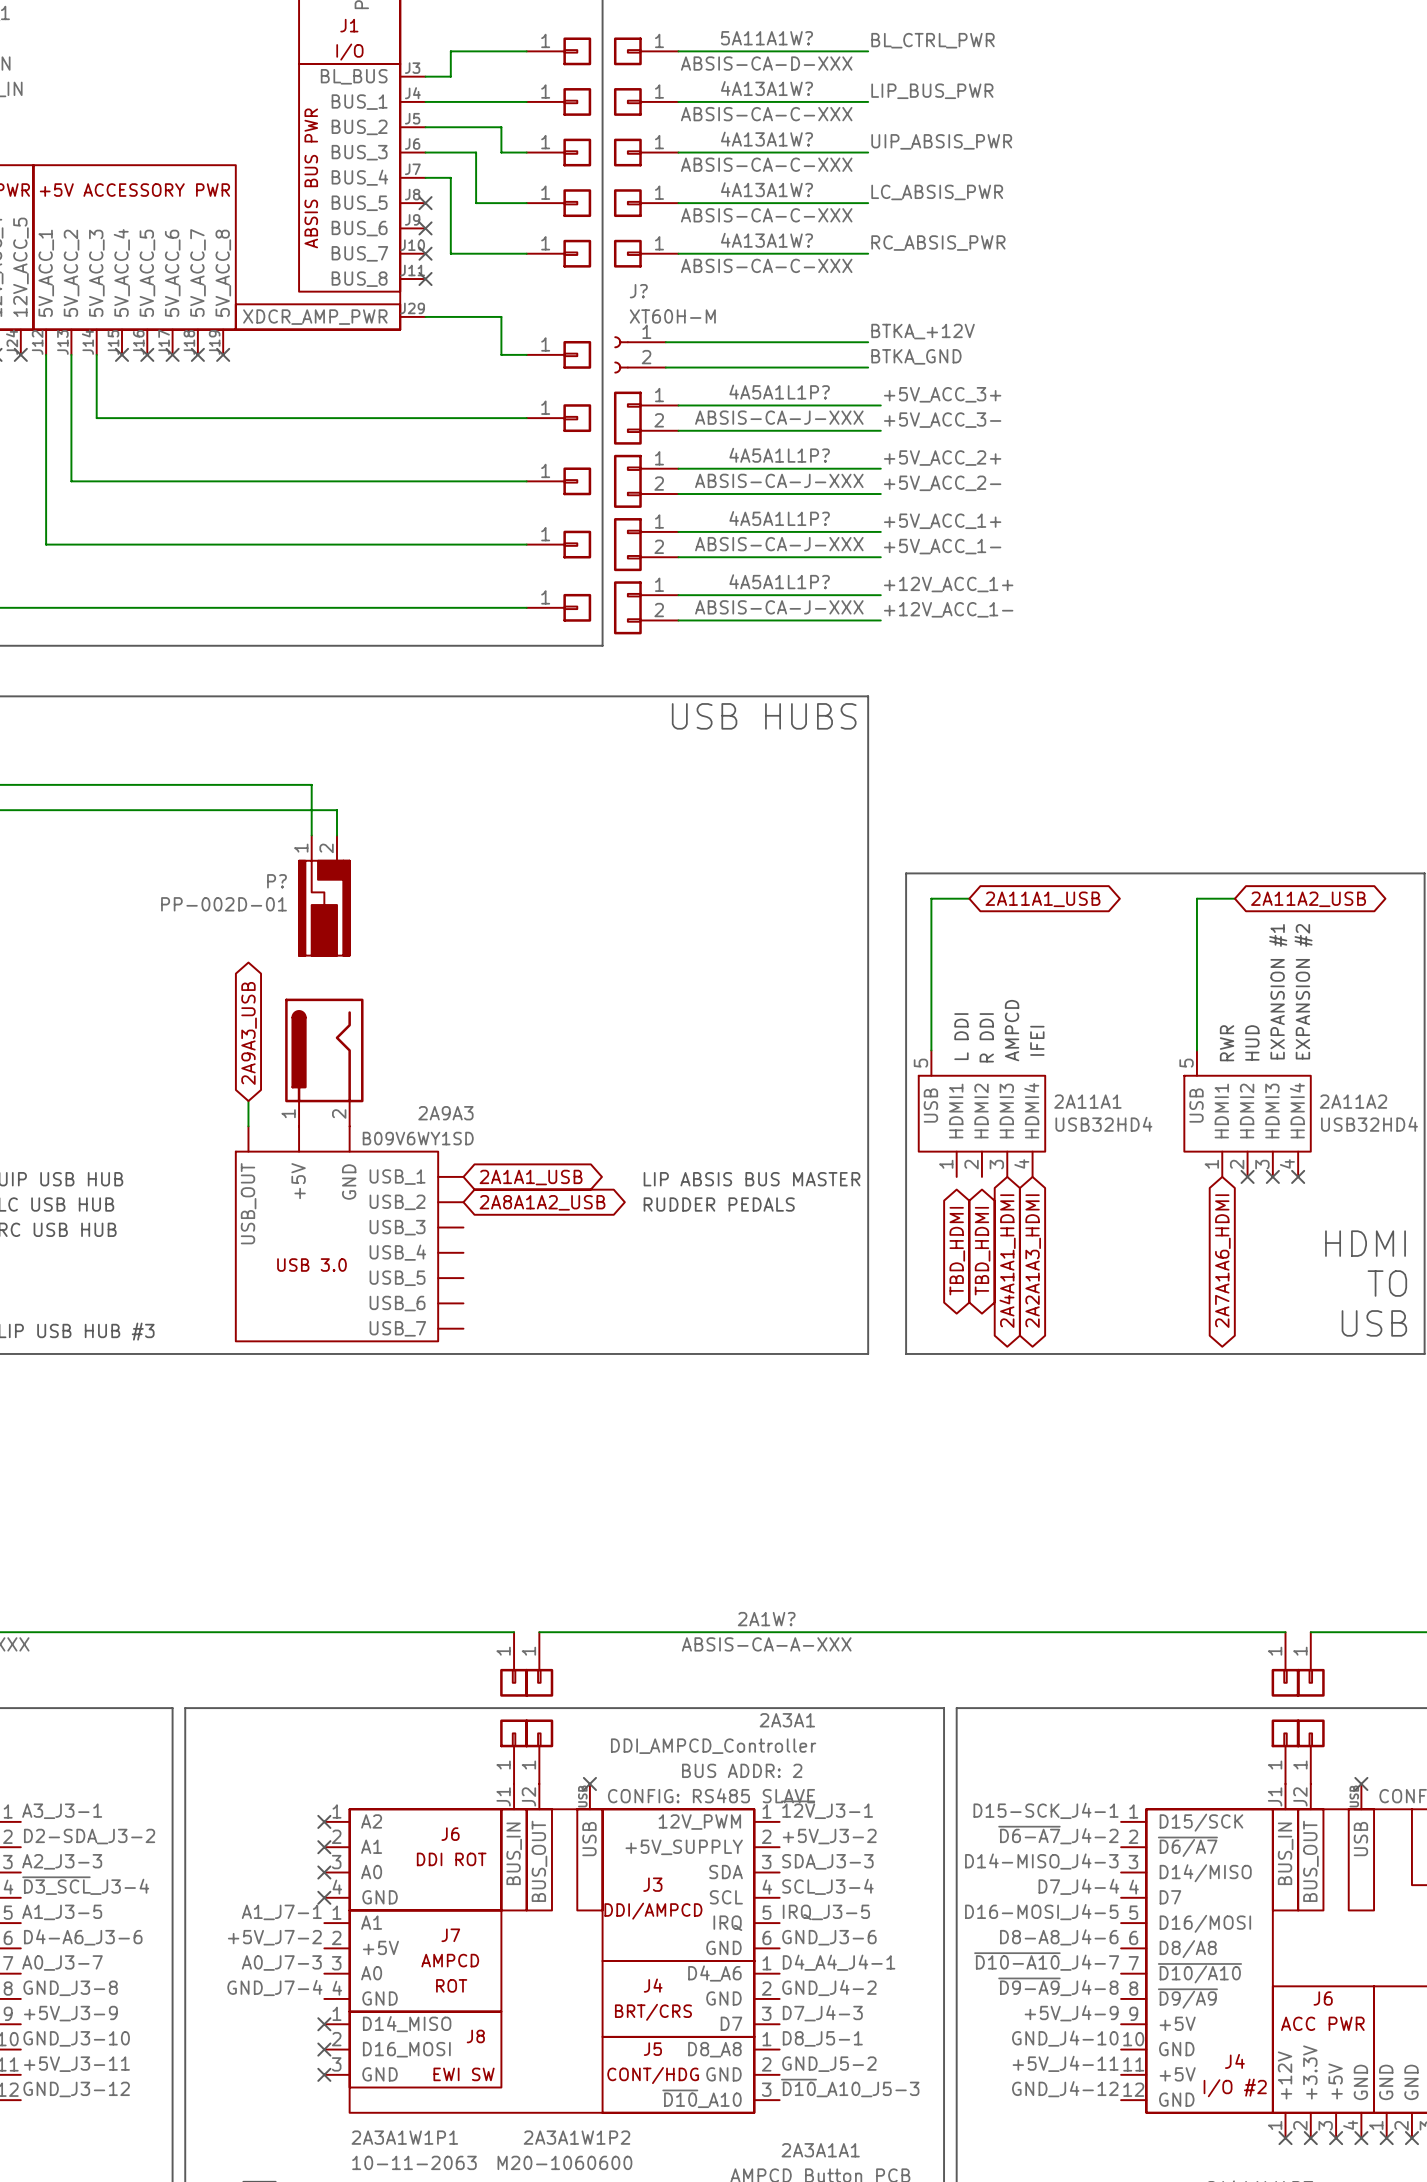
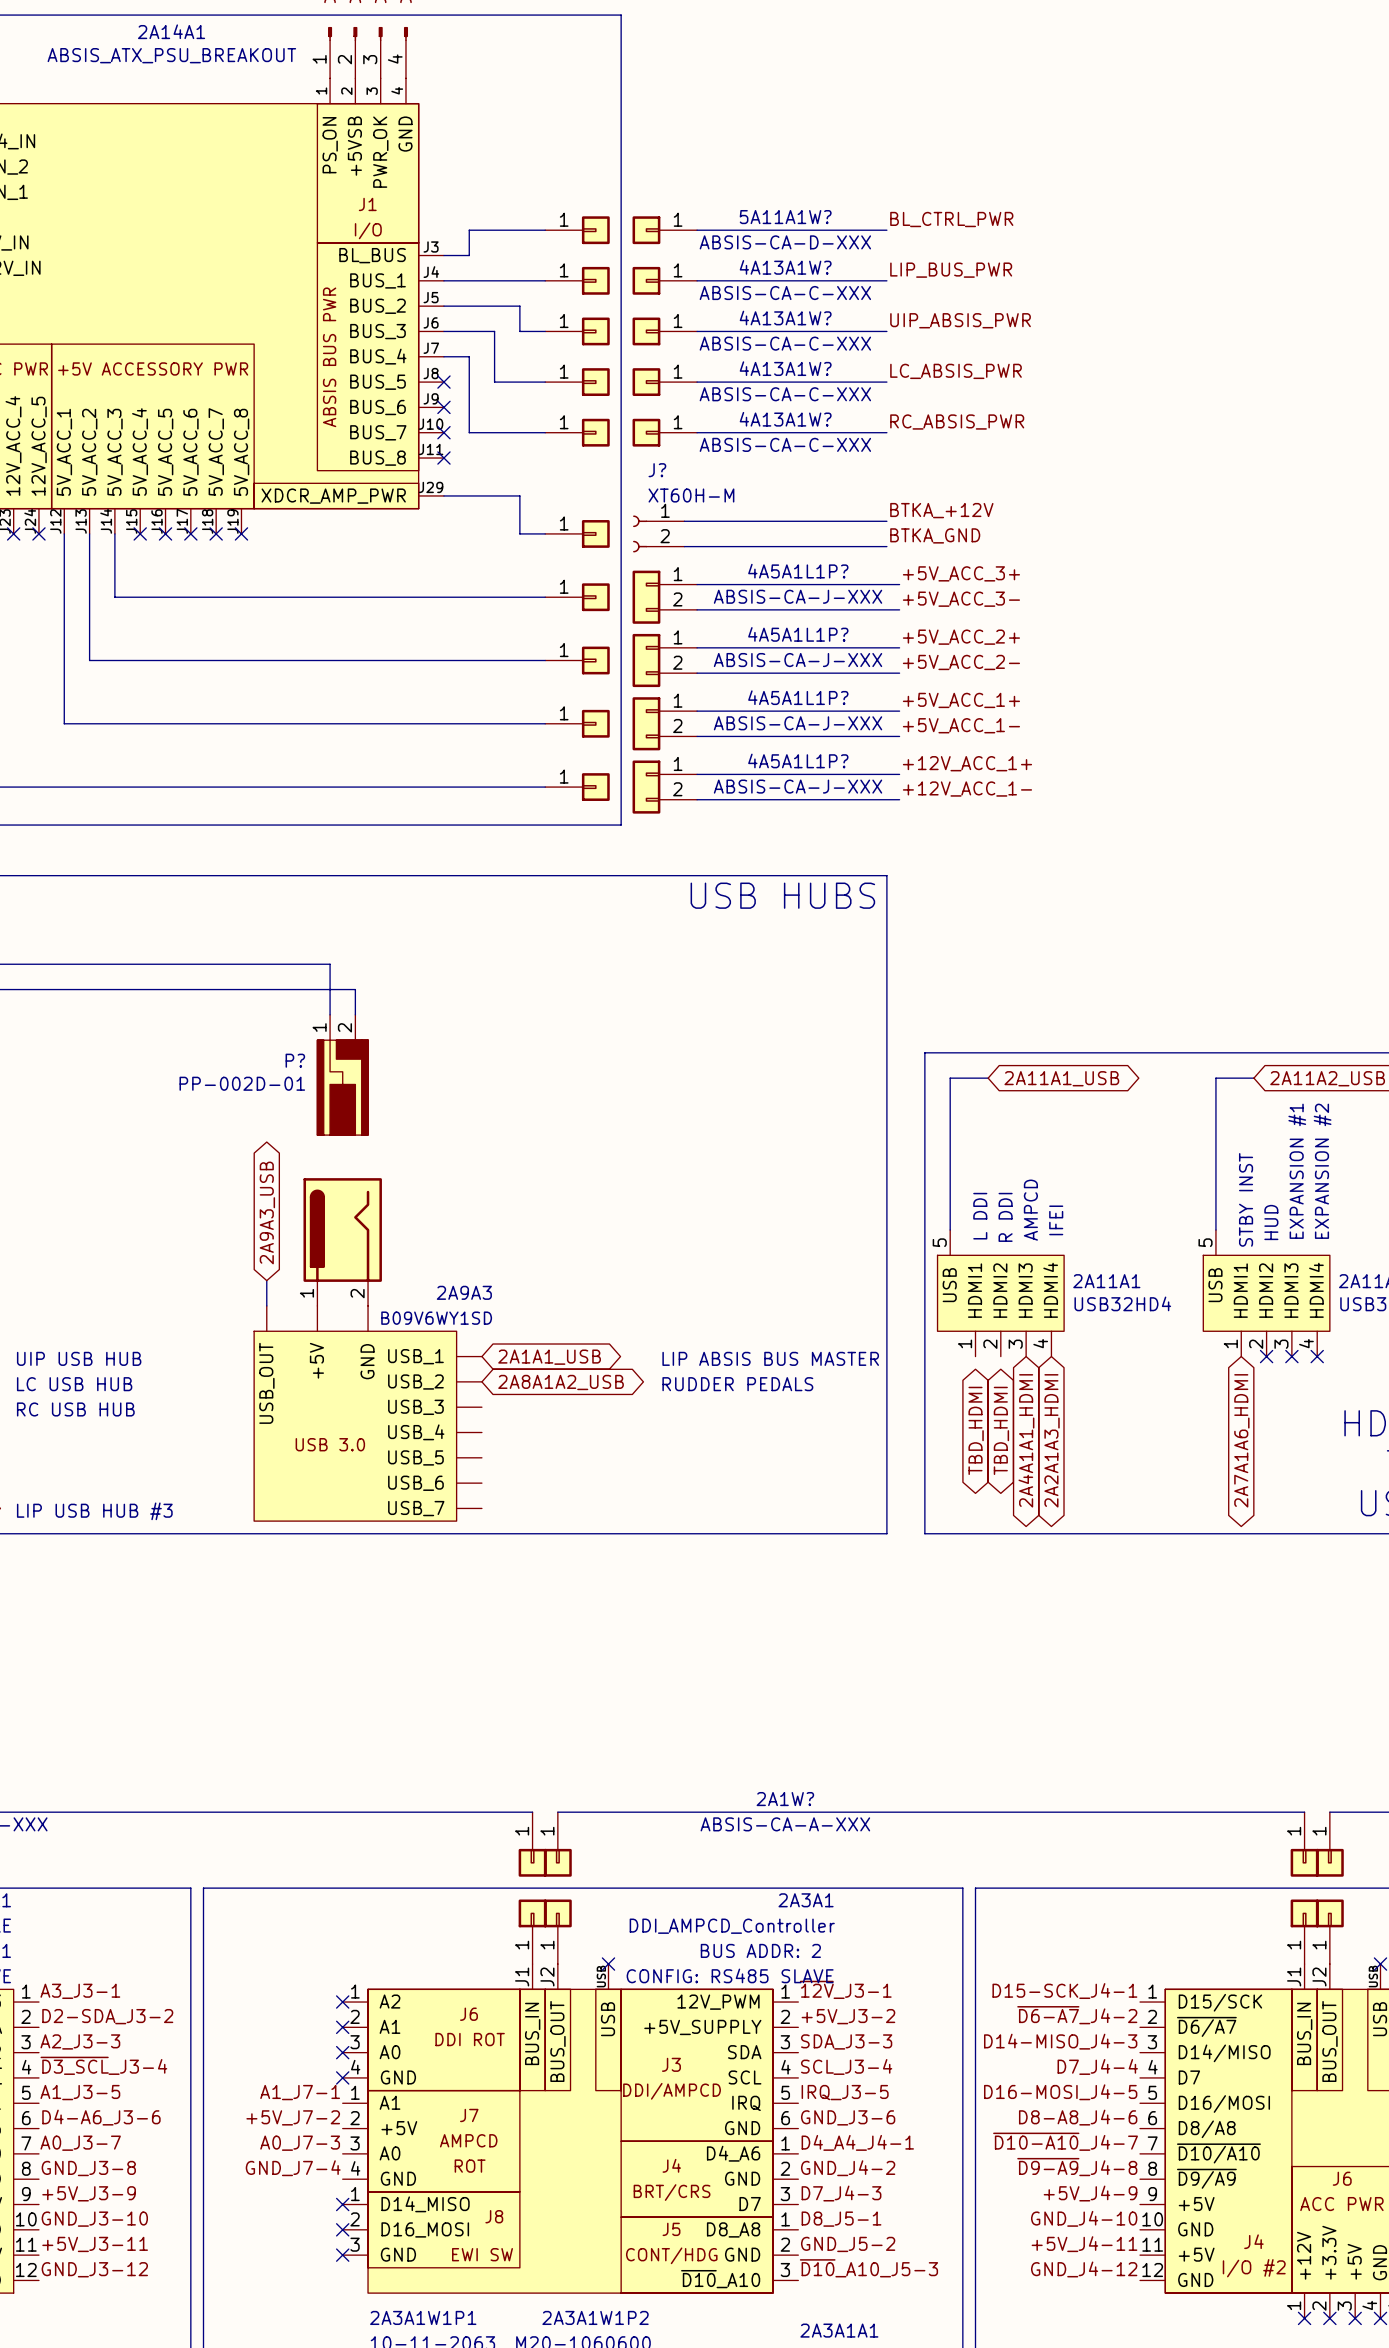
text: none -> STBY INST (1246, 1199)
text: RWR (1227, 1043) -> none

